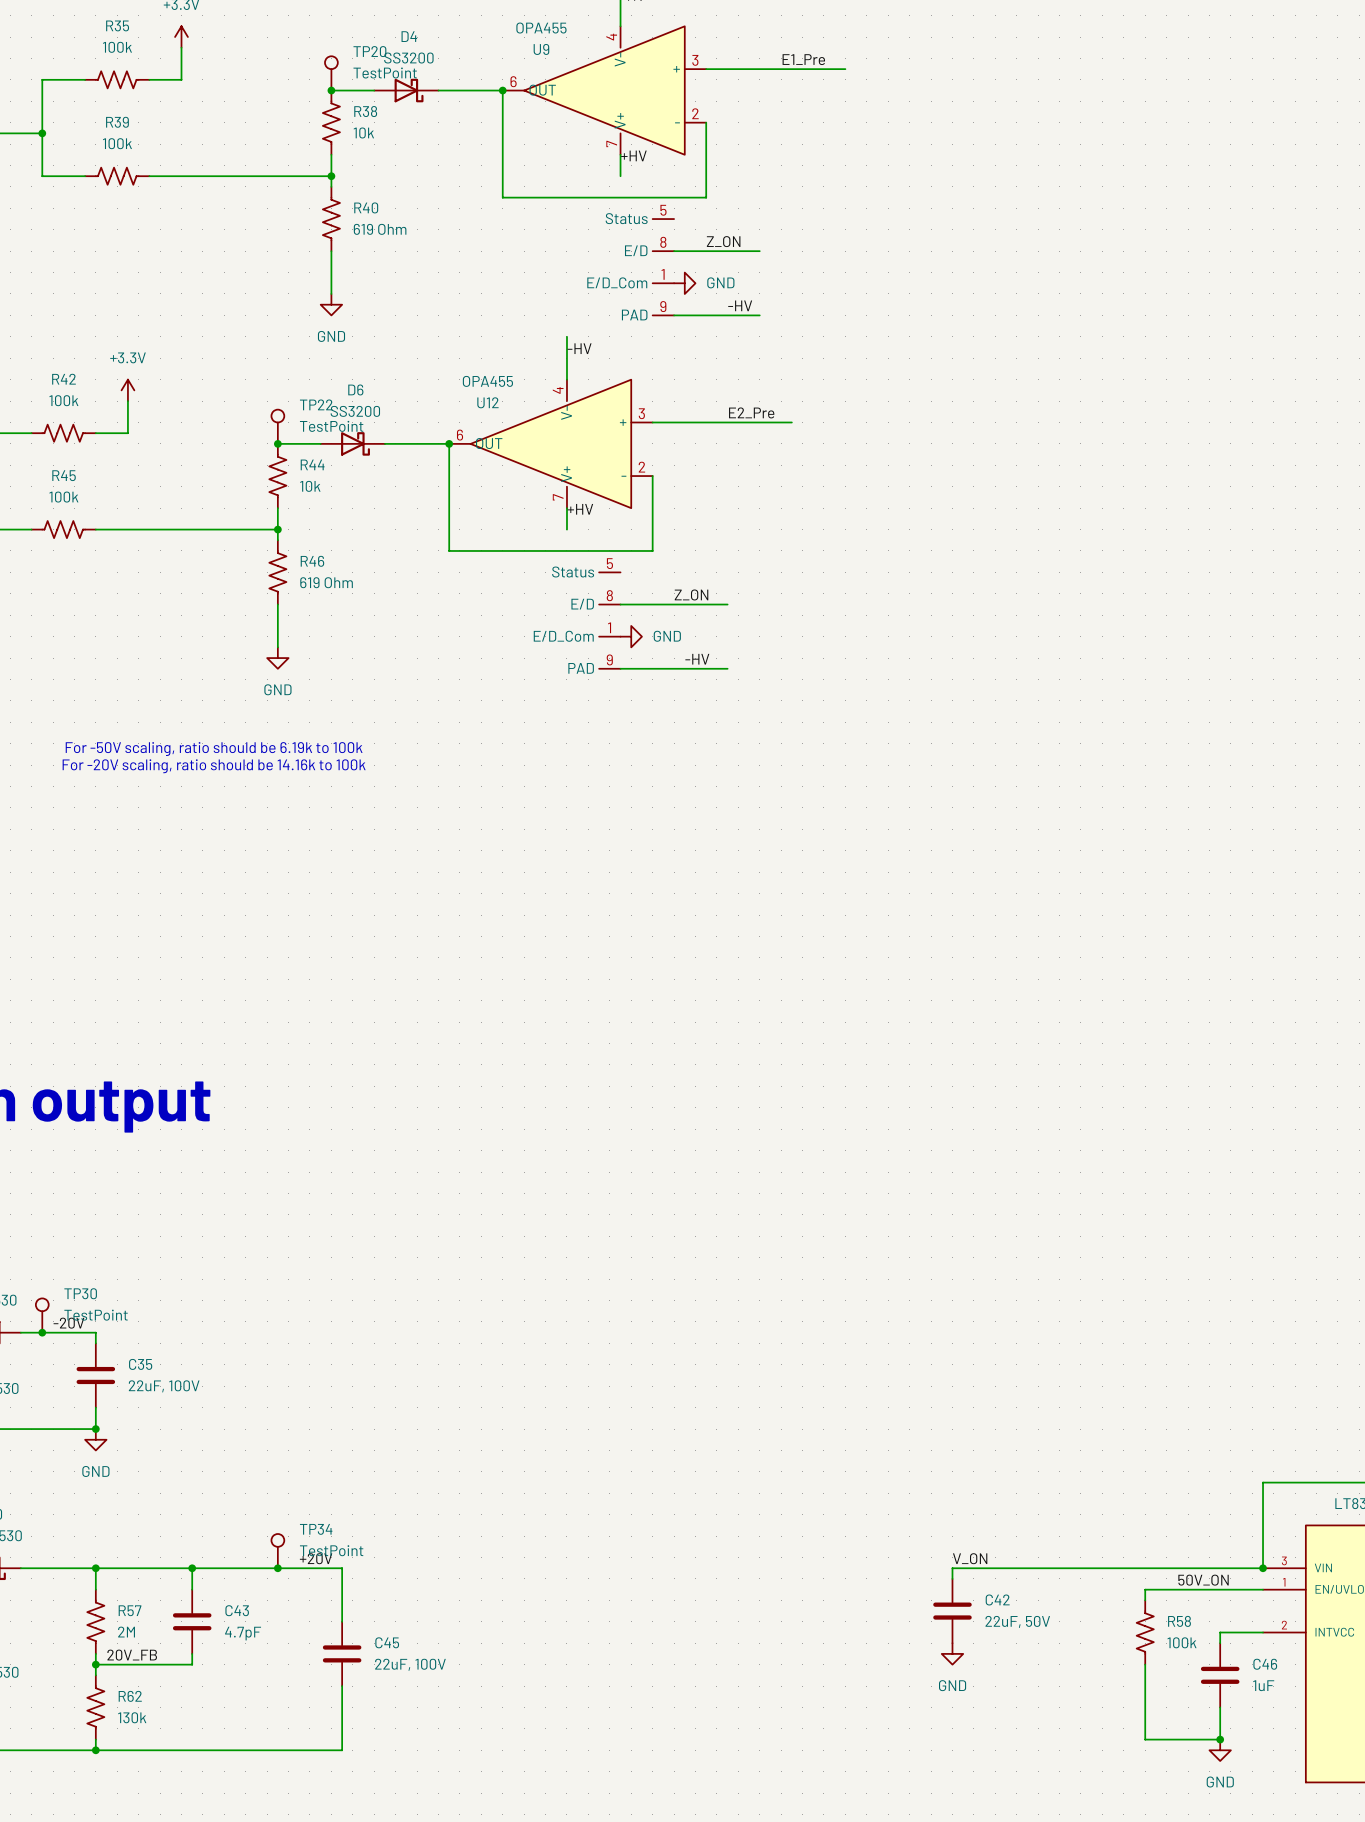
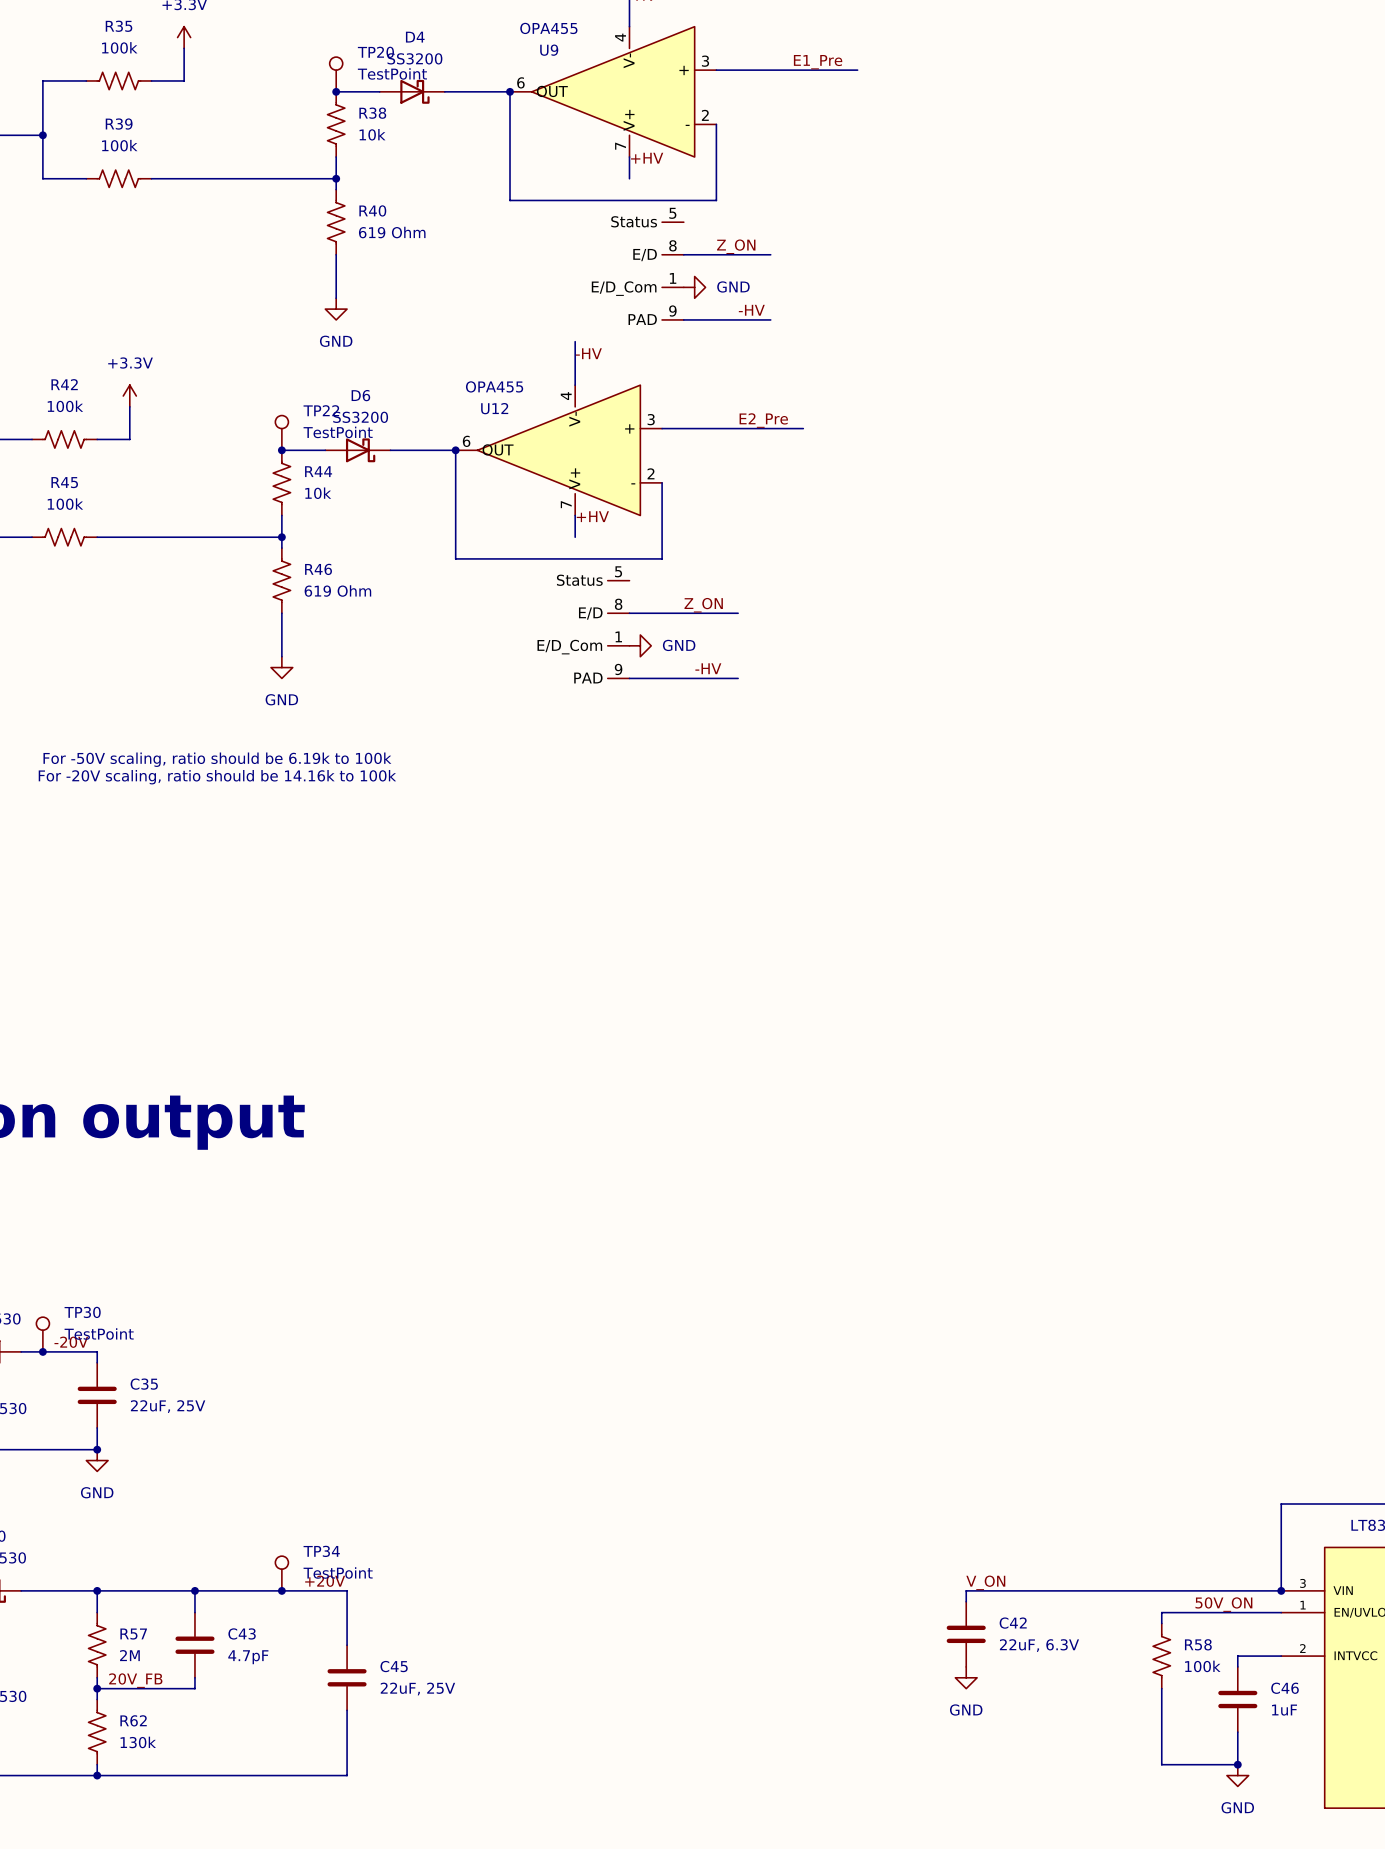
C35 value: 22uF, 100V (164, 1386) -> 22uF, 25V (168, 1406)
C42 value: 22uF, 50V (1017, 1621) -> 22uF, 6.3V (1039, 1645)
C45 value: 22uF, 100V (410, 1664) -> 22uF, 25V (417, 1689)

